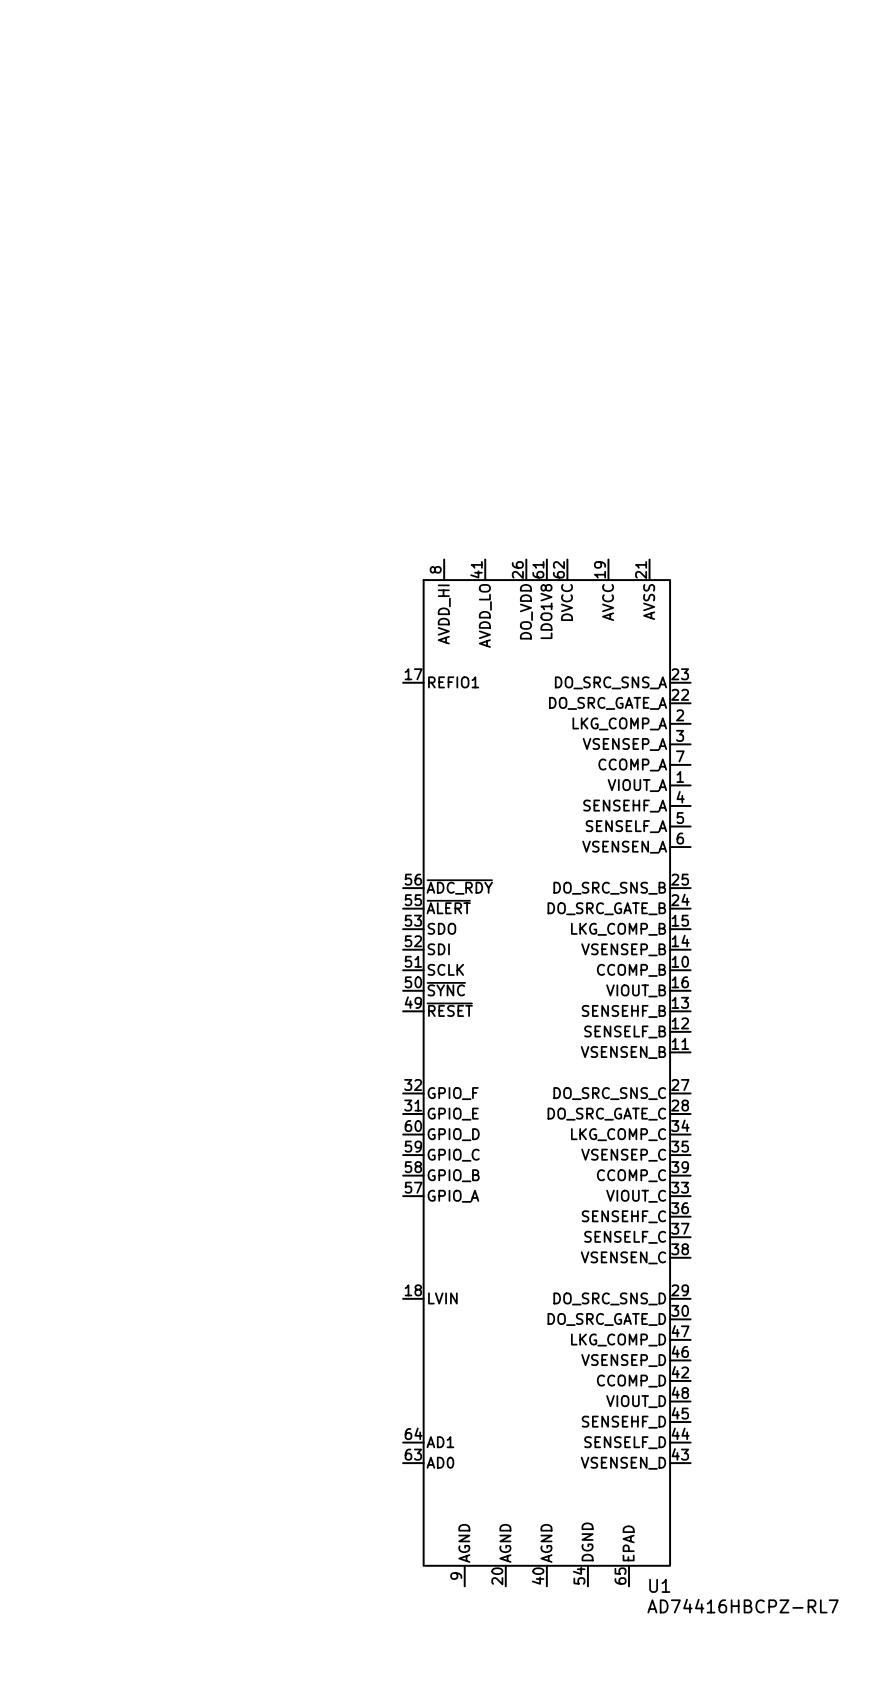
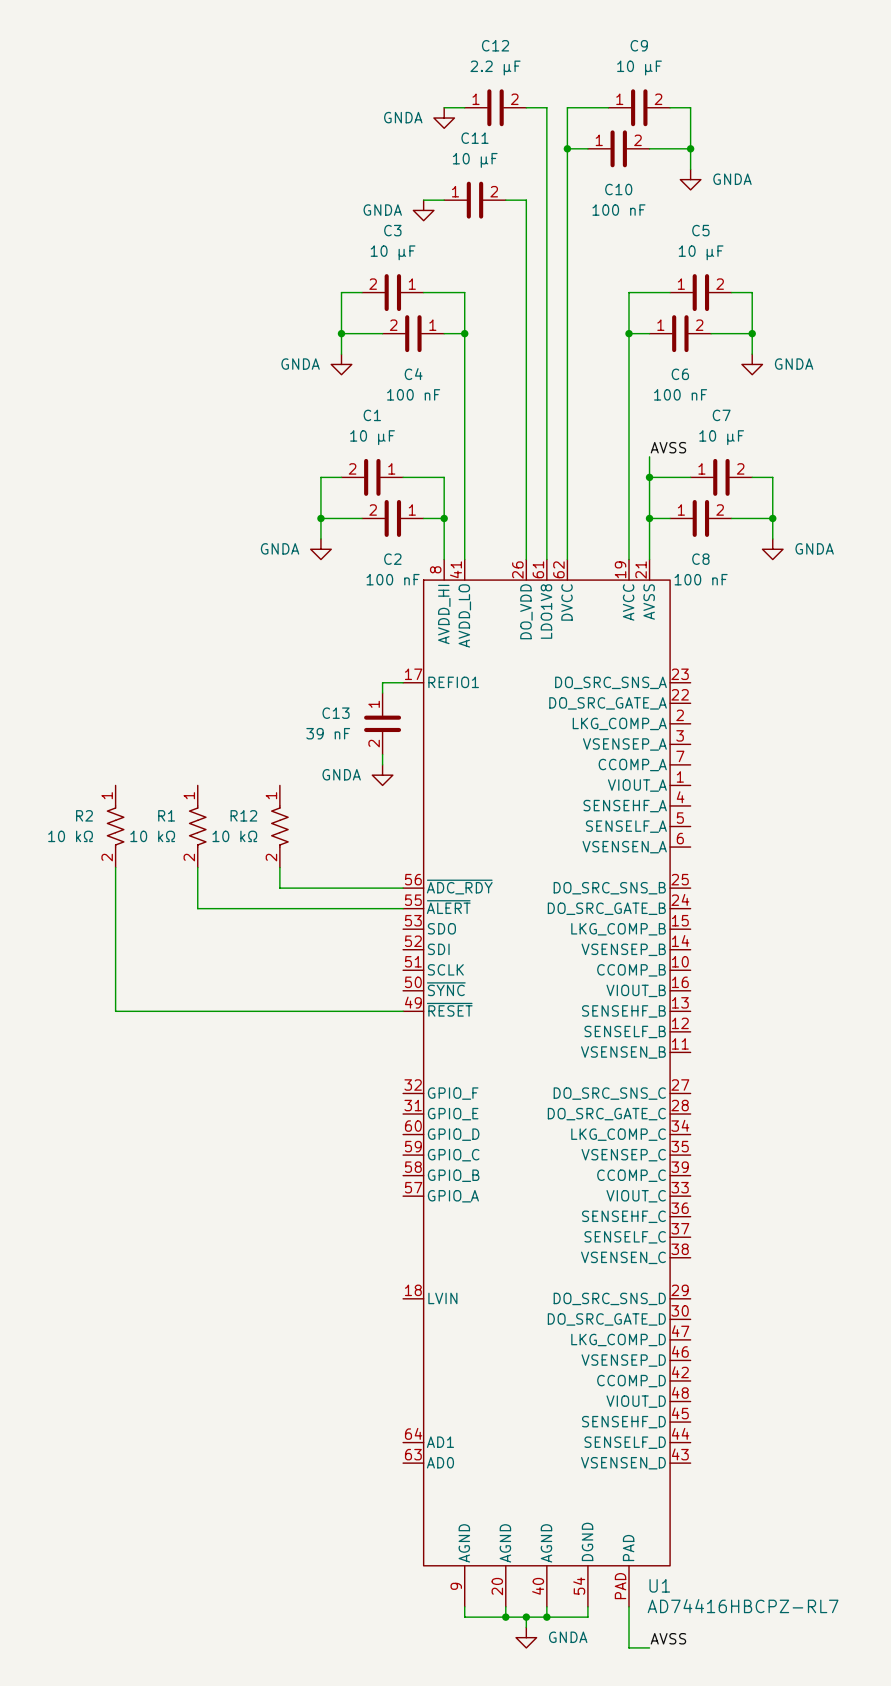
wire: none -> (444, 107) (464, 107)
C12: none -> 2.2 µF (495, 107)
wire: none -> (526, 107) (546, 107) (546, 559)
wire: none -> (608, 107) (567, 107) (567, 559)
C9: none -> 10 µF (639, 107)
wire: none -> (670, 107) (690, 107) (690, 169)
power symbol: none -> GNDA (444, 118)
wire: none -> (567, 148) (587, 148)
junction: none -> (567, 148)
C10: none -> 100 nF (618, 148)
wire: none -> (649, 148) (690, 148)
junction: none -> (690, 148)
power symbol: none -> GNDA (690, 179)
wire: none -> (423, 200) (444, 200)
C11: none -> 10 µF (474, 200)
wire: none -> (505, 200) (526, 200) (526, 559)
power symbol: none -> GNDA (423, 210)
wire: none -> (362, 292) (341, 292) (341, 354)
C3: none -> 10 µF (392, 292)
wire: none -> (423, 292) (464, 292) (464, 559)
wire: none -> (670, 292) (629, 292) (629, 559)
C5: none -> 10 µF (700, 292)
wire: none -> (731, 292) (752, 292) (752, 354)
wire: none -> (341, 333) (382, 333)
junction: none -> (341, 333)
C4: none -> 100 nF (413, 333)
wire: none -> (444, 333) (464, 333)
junction: none -> (464, 333)
wire: none -> (629, 333) (649, 333)
junction: none -> (629, 333)
C6: none -> 100 nF (680, 333)
wire: none -> (711, 333) (752, 333)
junction: none -> (752, 333)
power symbol: none -> GNDA (341, 364)
power symbol: none -> GNDA (752, 364)
label: none -> AVSS (668, 447)
wire: none -> (649, 456) (649, 559)
wire: none -> (341, 477) (320, 477) (320, 539)
C1: none -> 10 µF (372, 477)
wire: none -> (403, 477) (444, 477) (444, 559)
wire: none -> (649, 477) (690, 477)
junction: none -> (649, 477)
C7: none -> 10 µF (721, 477)
wire: none -> (752, 477) (772, 477) (772, 539)
wire: none -> (320, 518) (362, 518)
junction: none -> (320, 518)
C2: none -> 100 nF (392, 518)
wire: none -> (423, 518) (444, 518)
junction: none -> (444, 518)
wire: none -> (649, 518) (670, 518)
junction: none -> (649, 518)
C8: none -> 100 nF (700, 518)
wire: none -> (731, 518) (772, 518)
junction: none -> (772, 518)
power symbol: none -> GNDA (320, 549)
power symbol: none -> GNDA (772, 549)
U1 symbol: [403, 559, 691, 1587] -> [403, 559, 691, 1607]
wire: none -> (403, 682) (382, 682) (382, 693)
C13: none -> 39 nF (382, 723)
wire: none -> (382, 754) (382, 764)
power symbol: none -> GNDA (382, 775)
R2: none -> 10 kΩ (115, 826)
R1: none -> 10 kΩ (197, 826)
R12: none -> 10 kΩ (279, 826)
wire: none -> (115, 867) (115, 1011) (403, 1011)
wire: none -> (197, 867) (197, 908) (403, 908)
wire: none -> (279, 867) (279, 888) (403, 888)
wire: none -> (464, 1606) (464, 1617) (587, 1617) (587, 1606)
wire: none -> (505, 1606) (505, 1617)
wire: none -> (546, 1606) (546, 1617)
wire: none -> (629, 1606) (629, 1647) (649, 1647)
junction: none -> (505, 1617)
wire: none -> (526, 1617) (526, 1627)
junction: none -> (526, 1617)
junction: none -> (546, 1617)
power symbol: none -> GNDA (526, 1637)
label: none -> AVSS (668, 1638)

